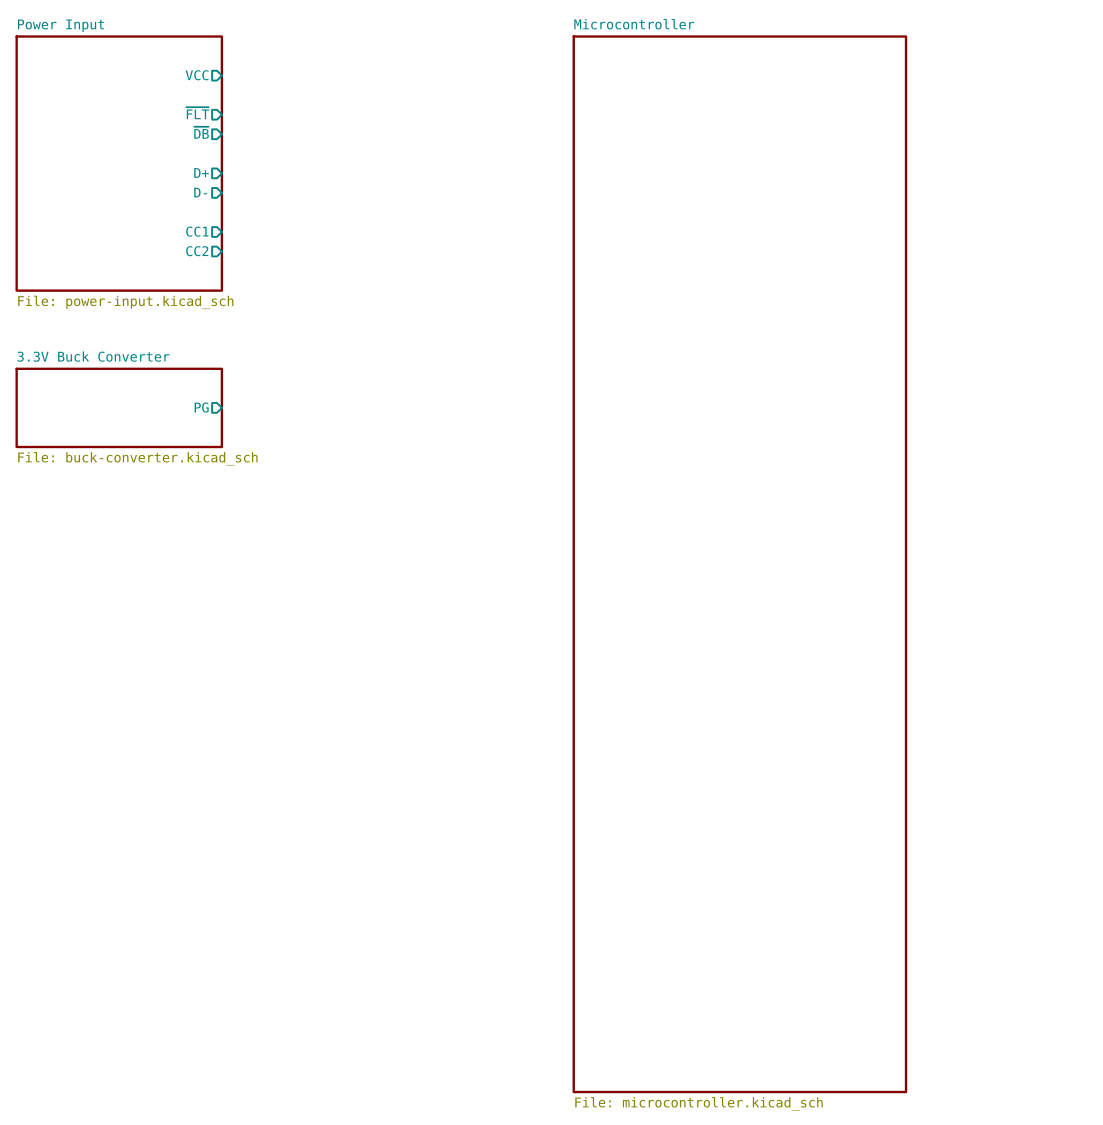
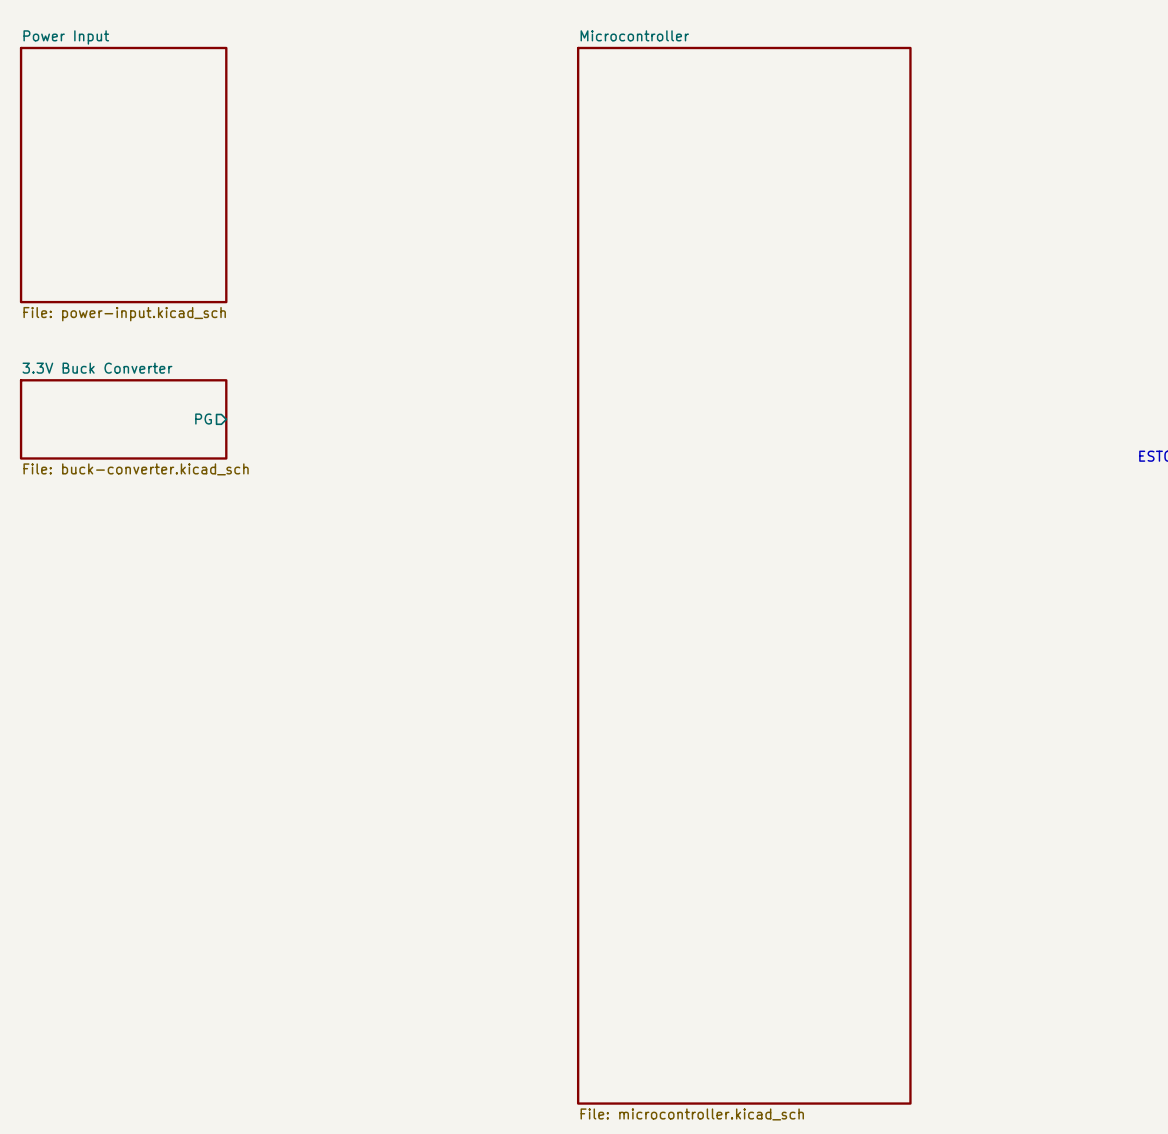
sheet pin: VCC (197, 75) -> none
sheet pin: ~{FLT} (197, 113) -> none
sheet pin: ~{DB} (201, 132) -> none
sheet pin: D+ (201, 172) -> none
sheet pin: D- (200, 192) -> none
sheet pin: CC1 (197, 231) -> none
sheet pin: CC2 (197, 251) -> none

